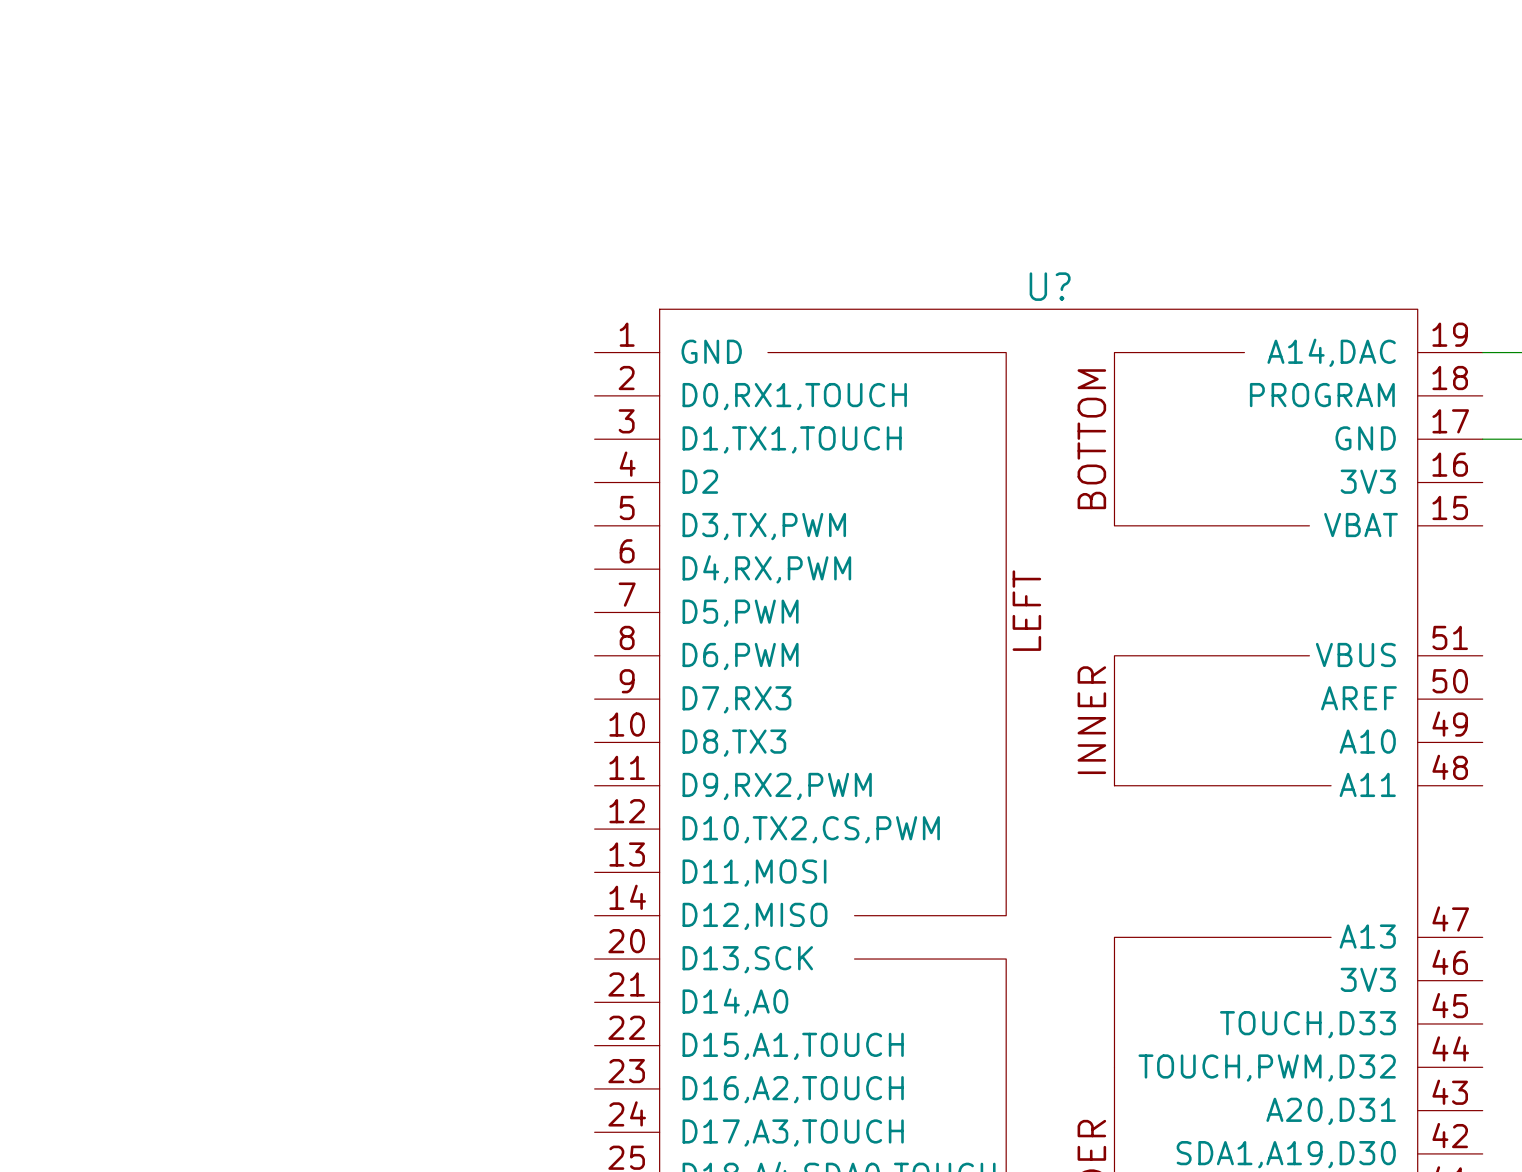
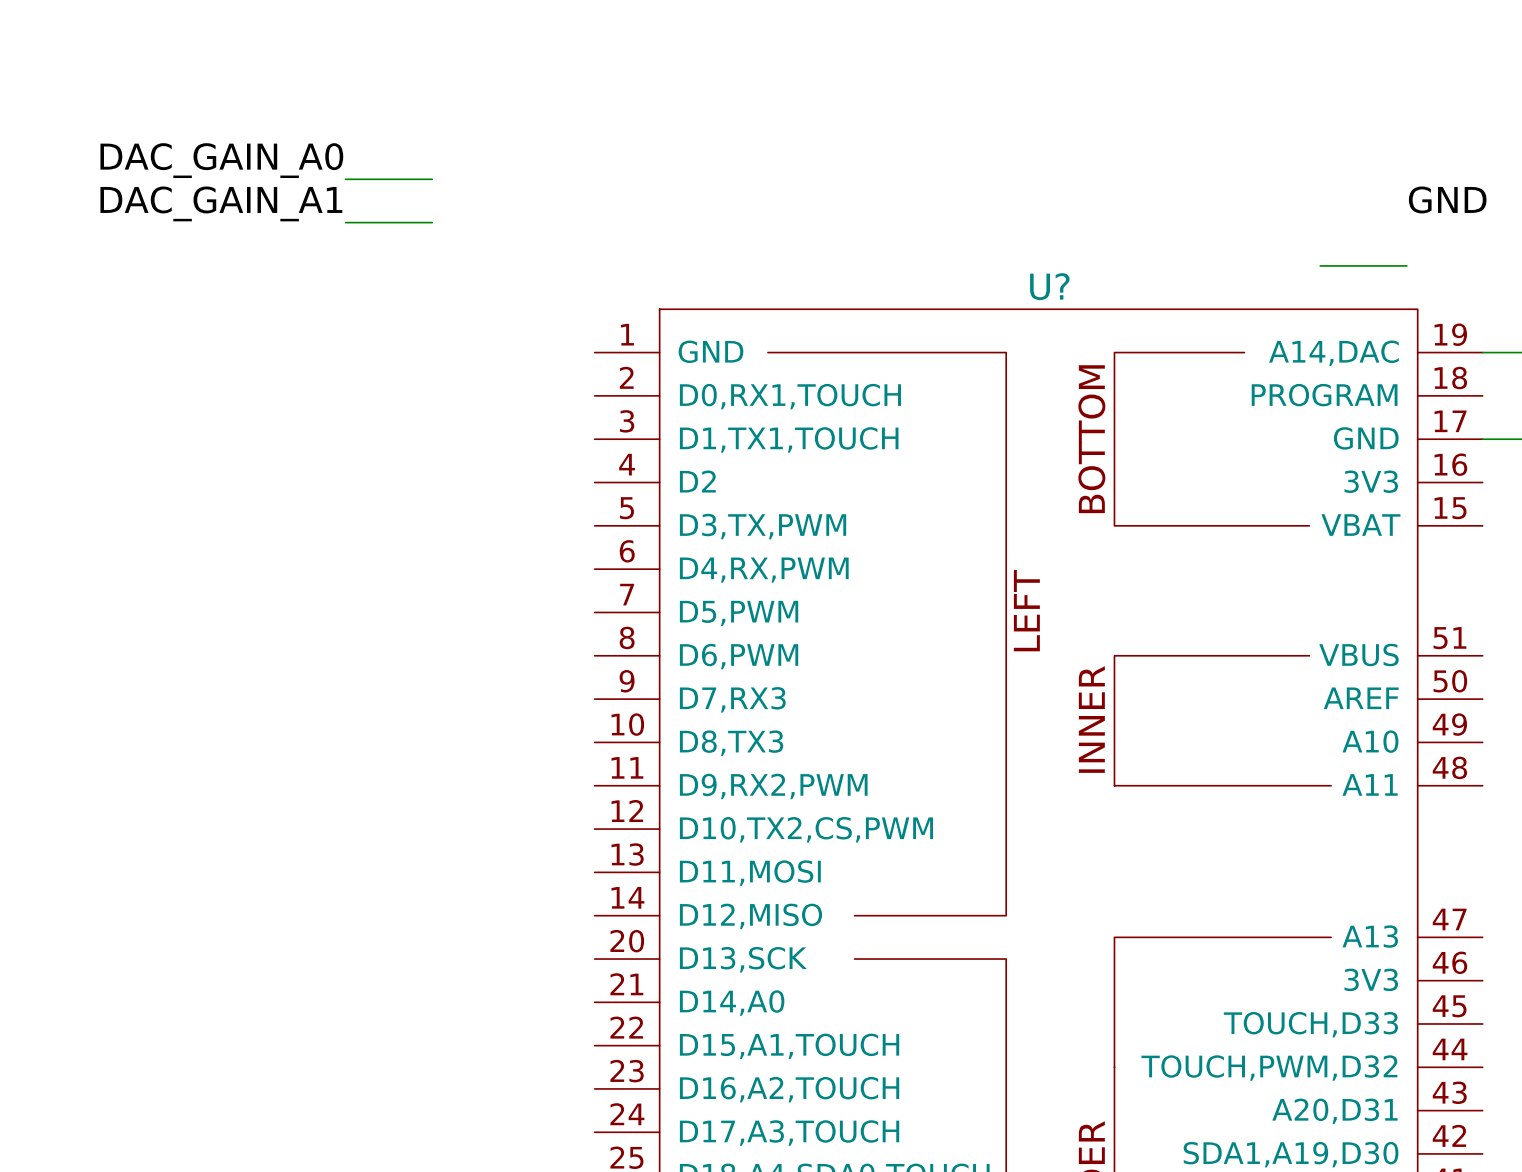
label: none -> DAC_GAIN_A0 (221, 160)
wire: none -> (345, 179) (432, 179)
label: none -> GND (1447, 199)
label: none -> DAC_GAIN_A1 (221, 203)
wire: none -> (345, 222) (432, 222)
wire: none -> (1320, 265) (1406, 265)

